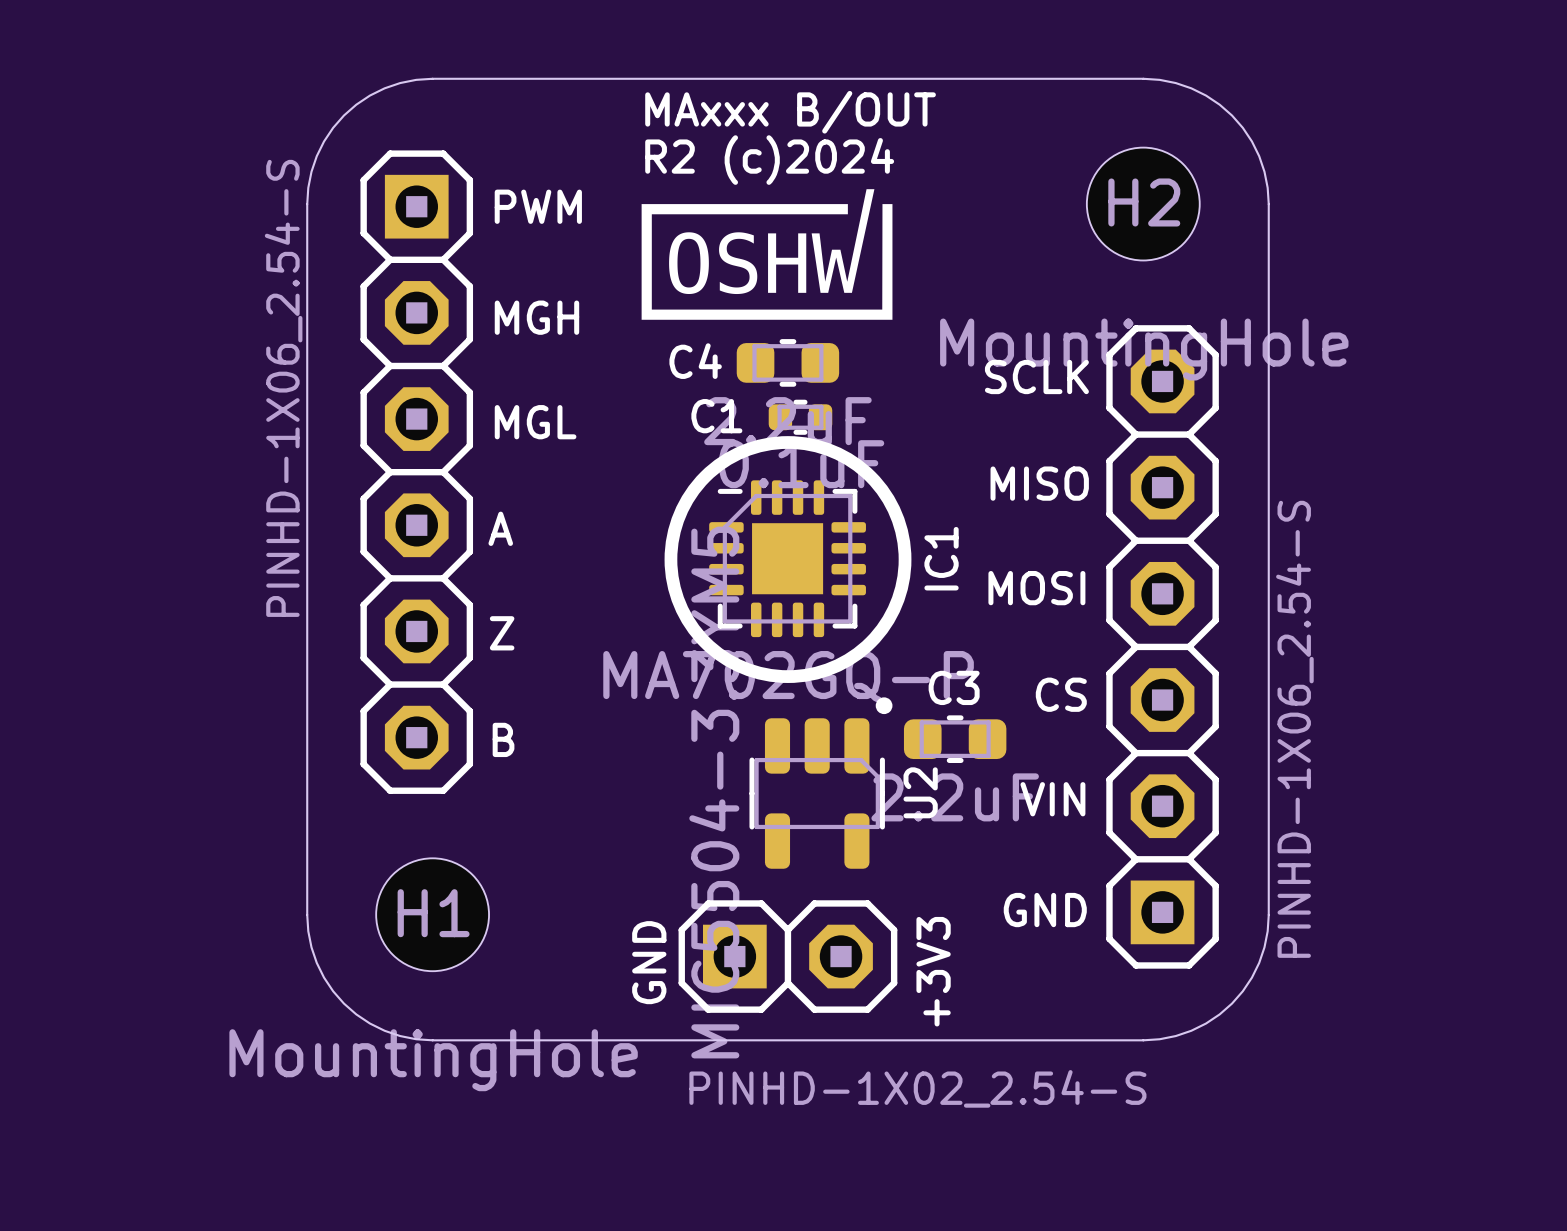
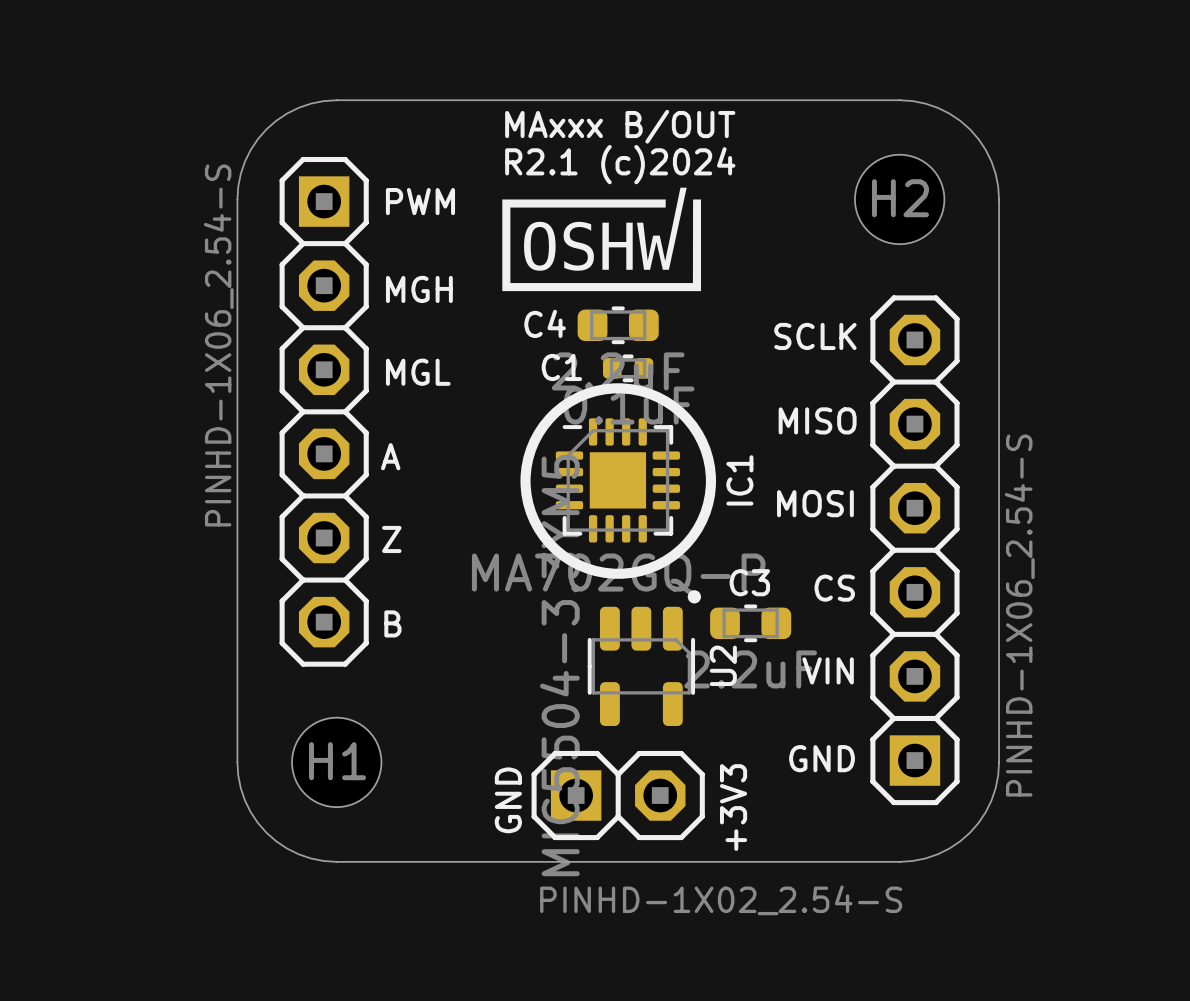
text: R2 (c)2024 (769, 160) -> R2.1 (c)2024 (620, 164)
H2 value: MountingHole (1144, 349) -> none
H1 value: MountingHole (433, 1060) -> none

